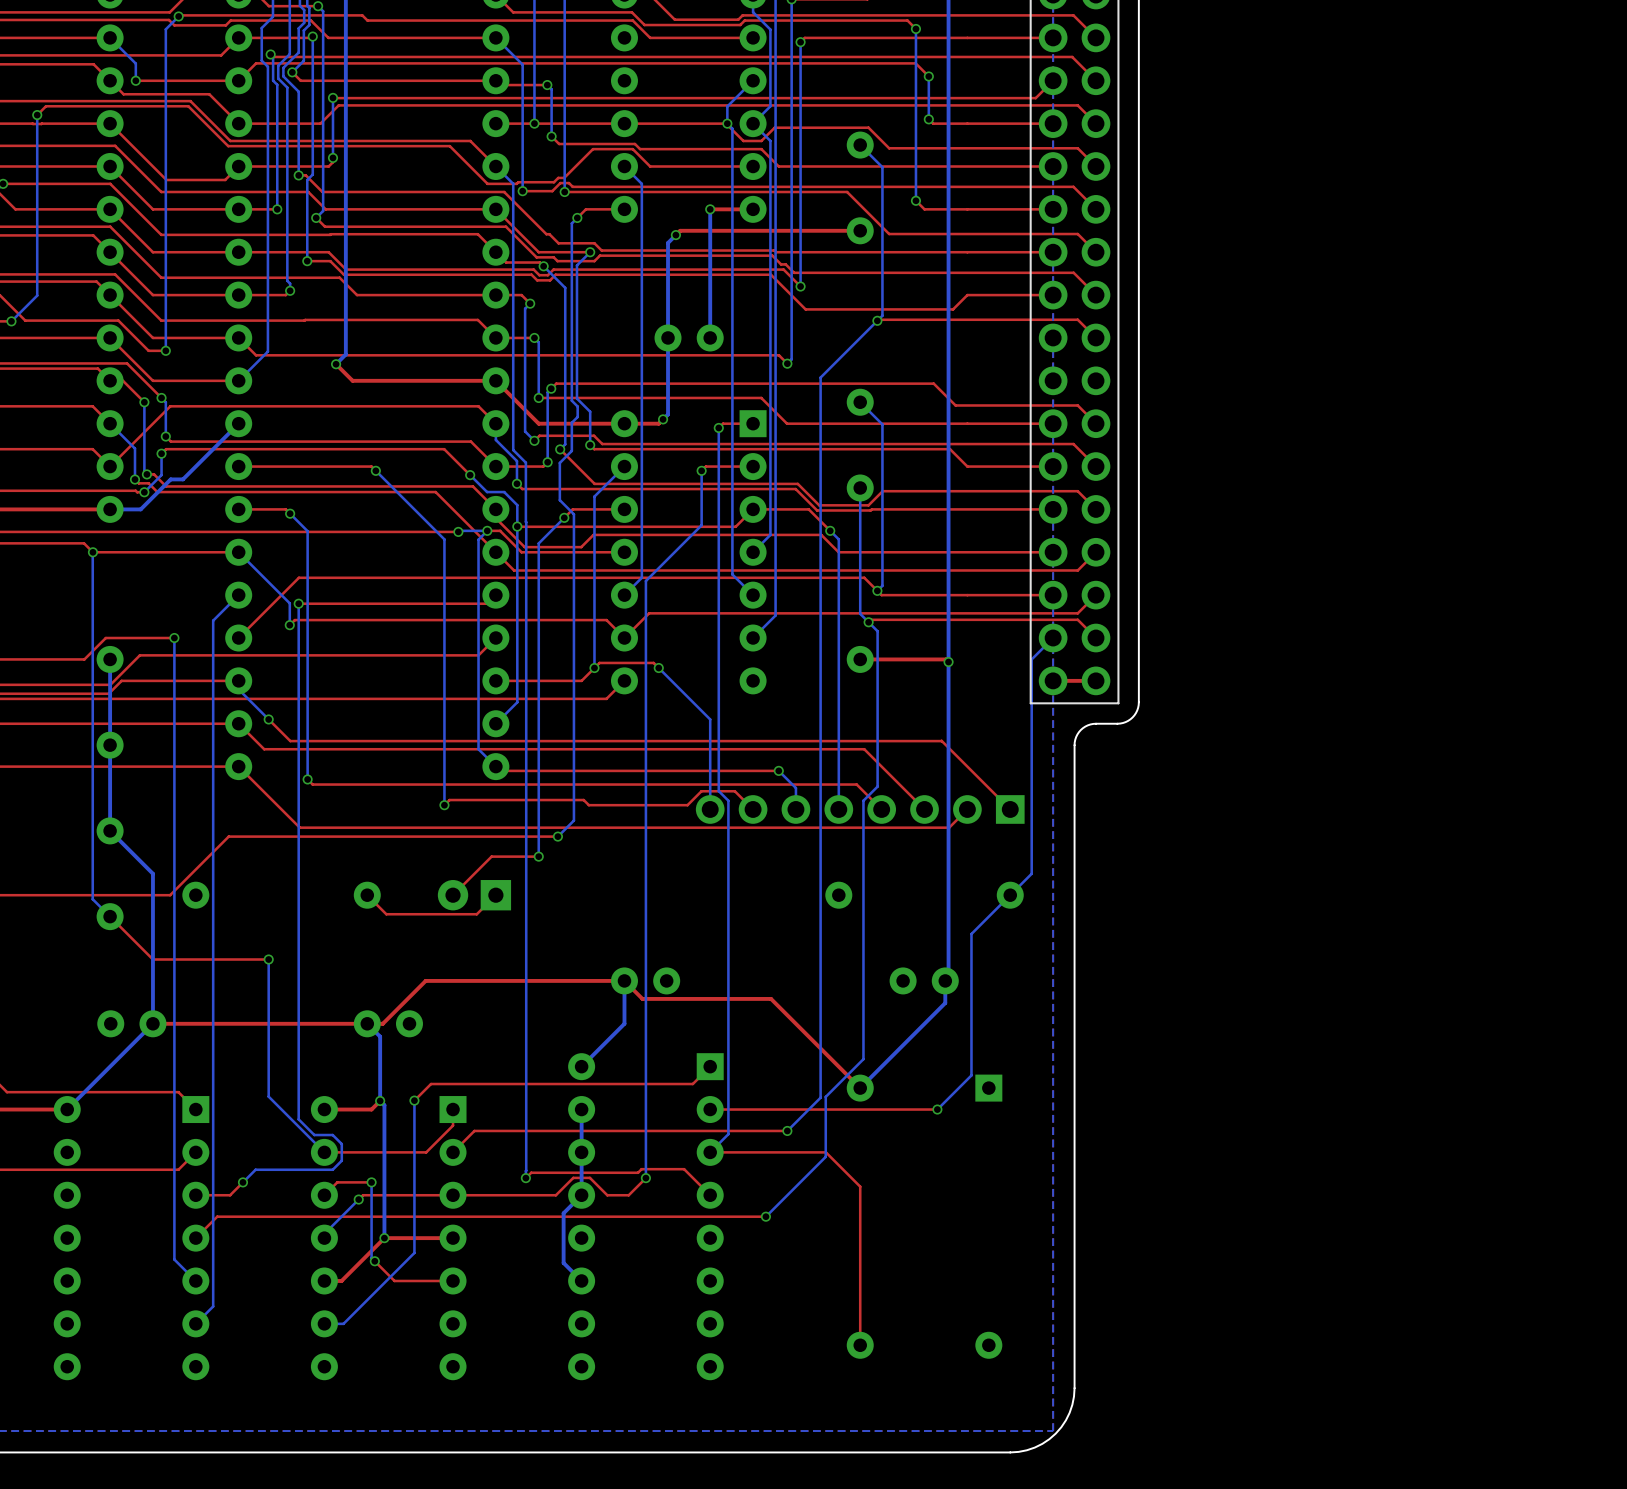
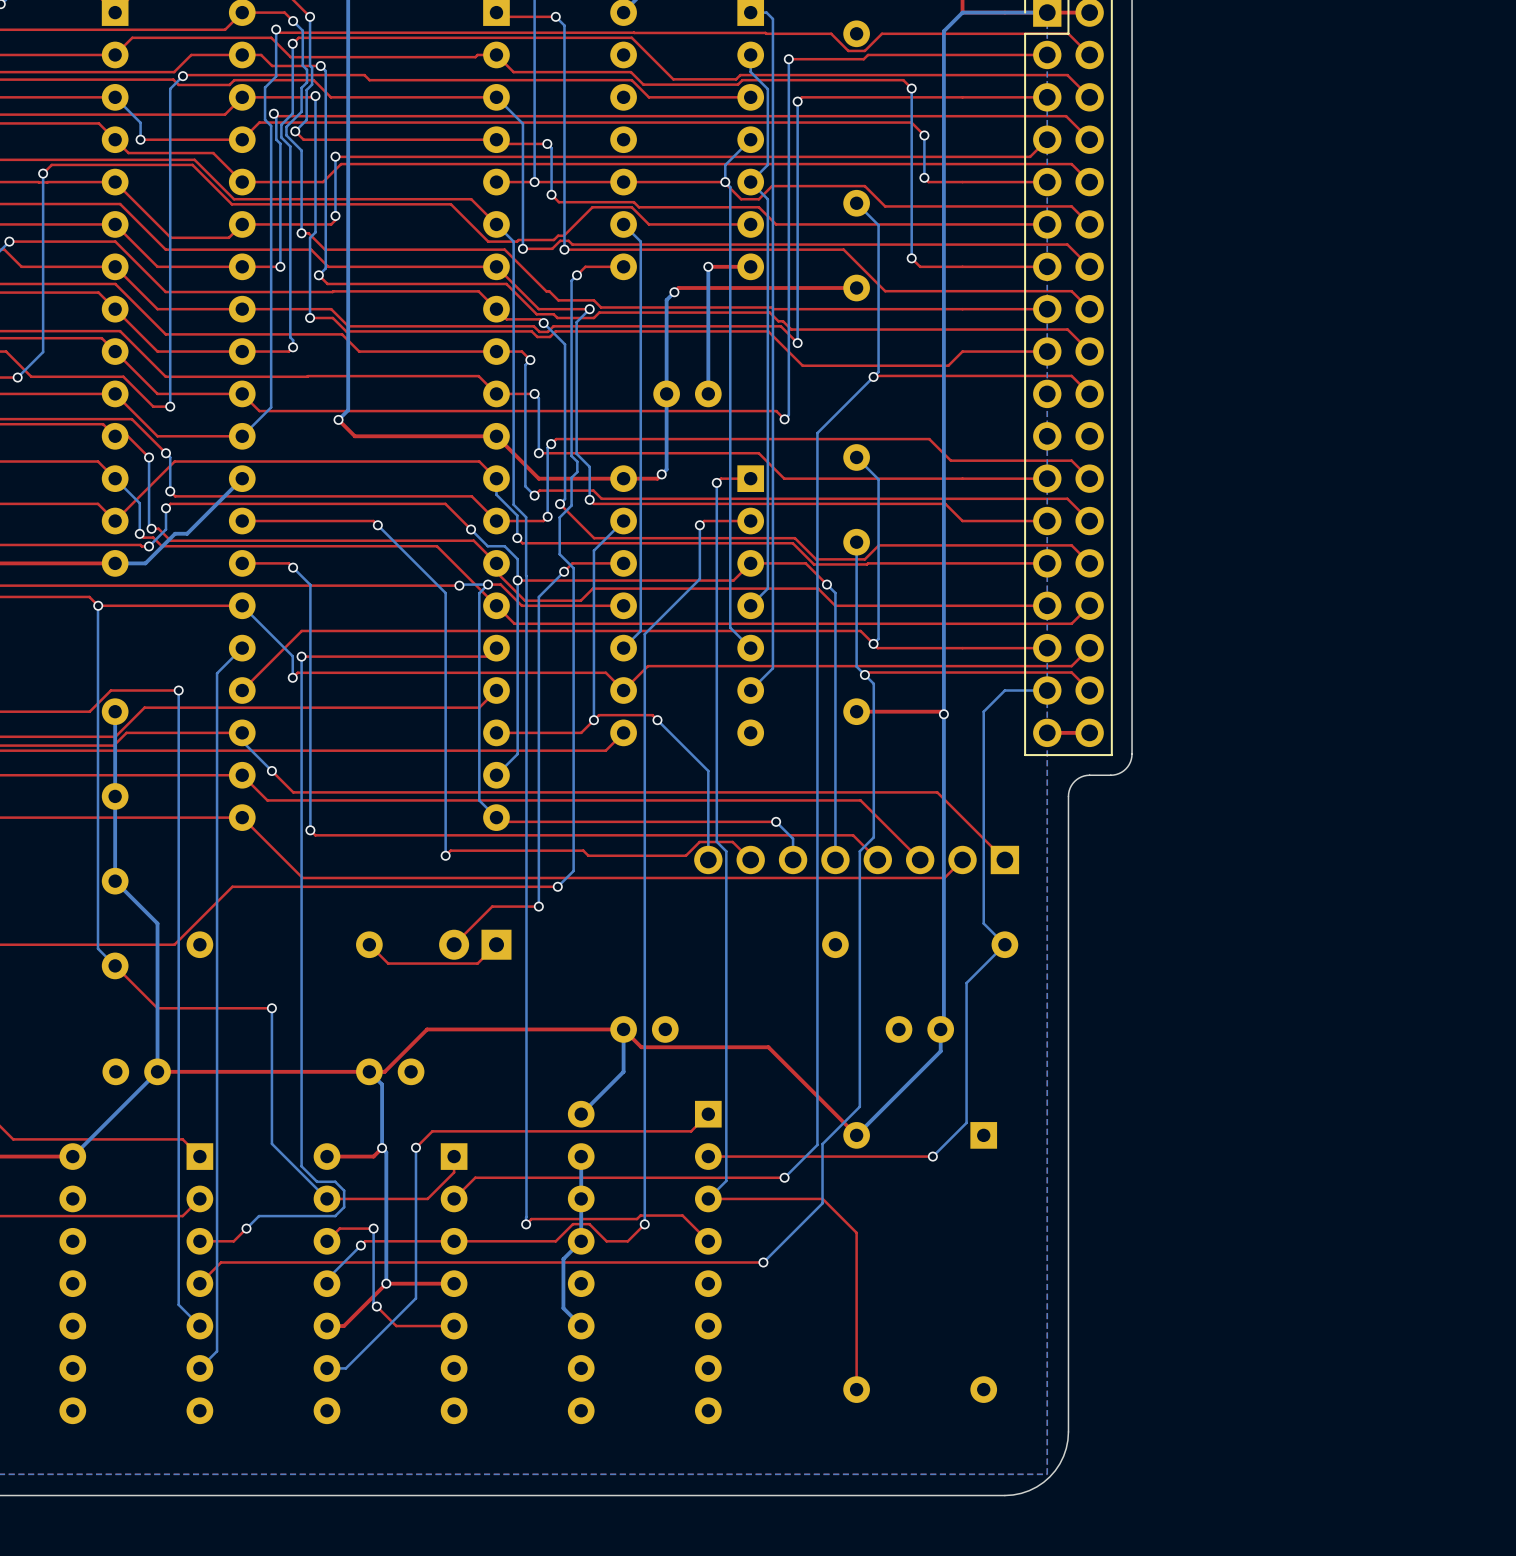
bottom track: (1053, 638) (1031, 659) (1031, 873) (1010, 895) -> (1047, 690) (1004, 690) (983, 711) (983, 923) (1004, 944)

